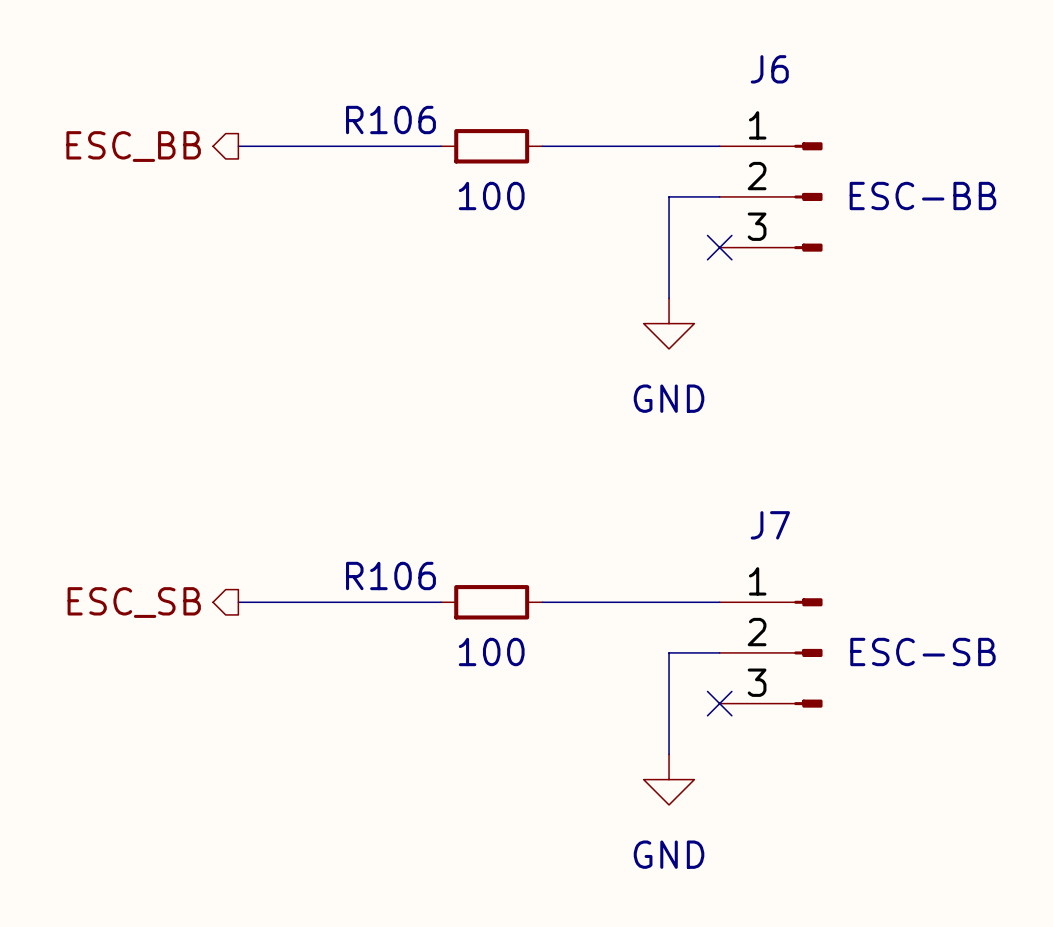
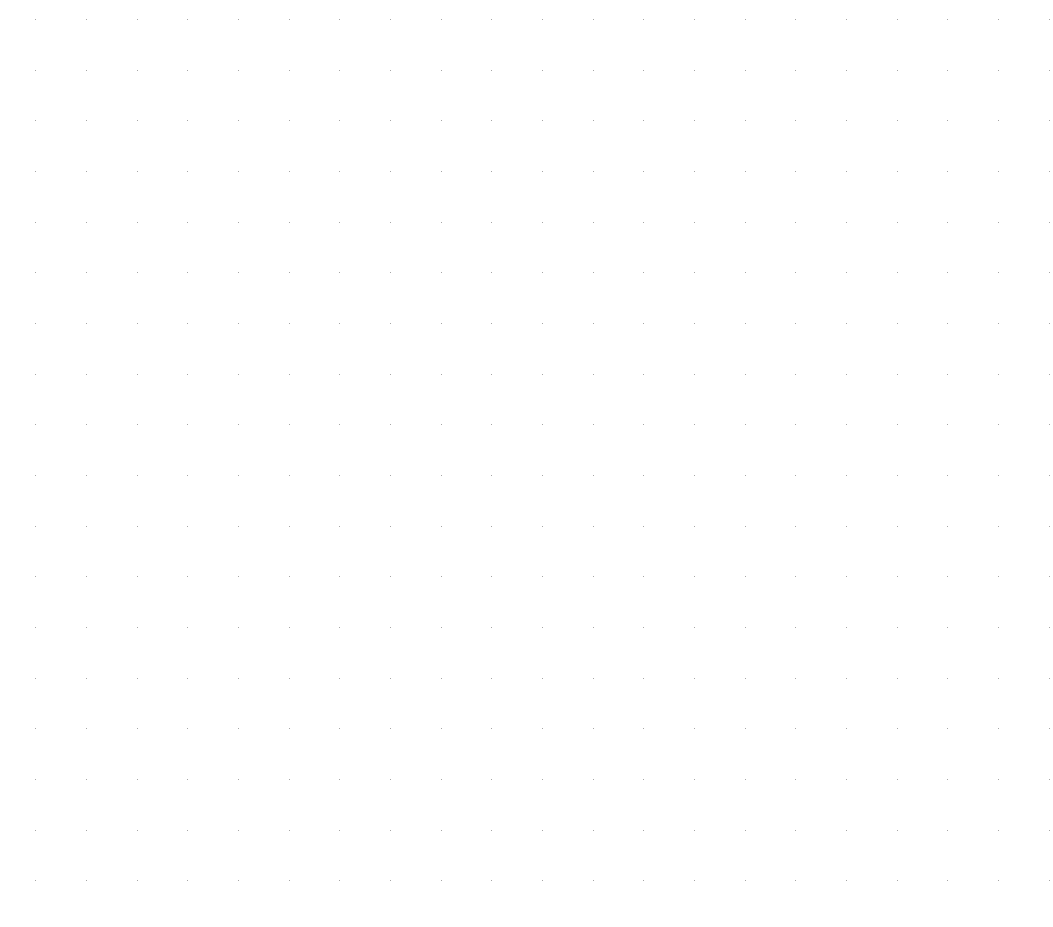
hierarchical label: ESC_BB (133, 146) -> none
wire: (238, 146) (441, 146) -> none
R106: 100 (491, 146) -> none
wire: (542, 146) (719, 146) -> none
wire: (719, 196) (669, 196) (669, 298) -> none
J6: ESC-BB (771, 196) -> none
no-connect mark: (719, 247) -> none
power symbol: GND (669, 323) -> none
hierarchical label: ESC_SB (134, 602) -> none
wire: (238, 602) (441, 602) -> none
R106: 100 (491, 602) -> none
wire: (542, 602) (719, 602) -> none
wire: (719, 652) (669, 652) (669, 754) -> none
J7: ESC-SB (771, 652) -> none
no-connect mark: (719, 703) -> none
power symbol: GND (669, 779) -> none

